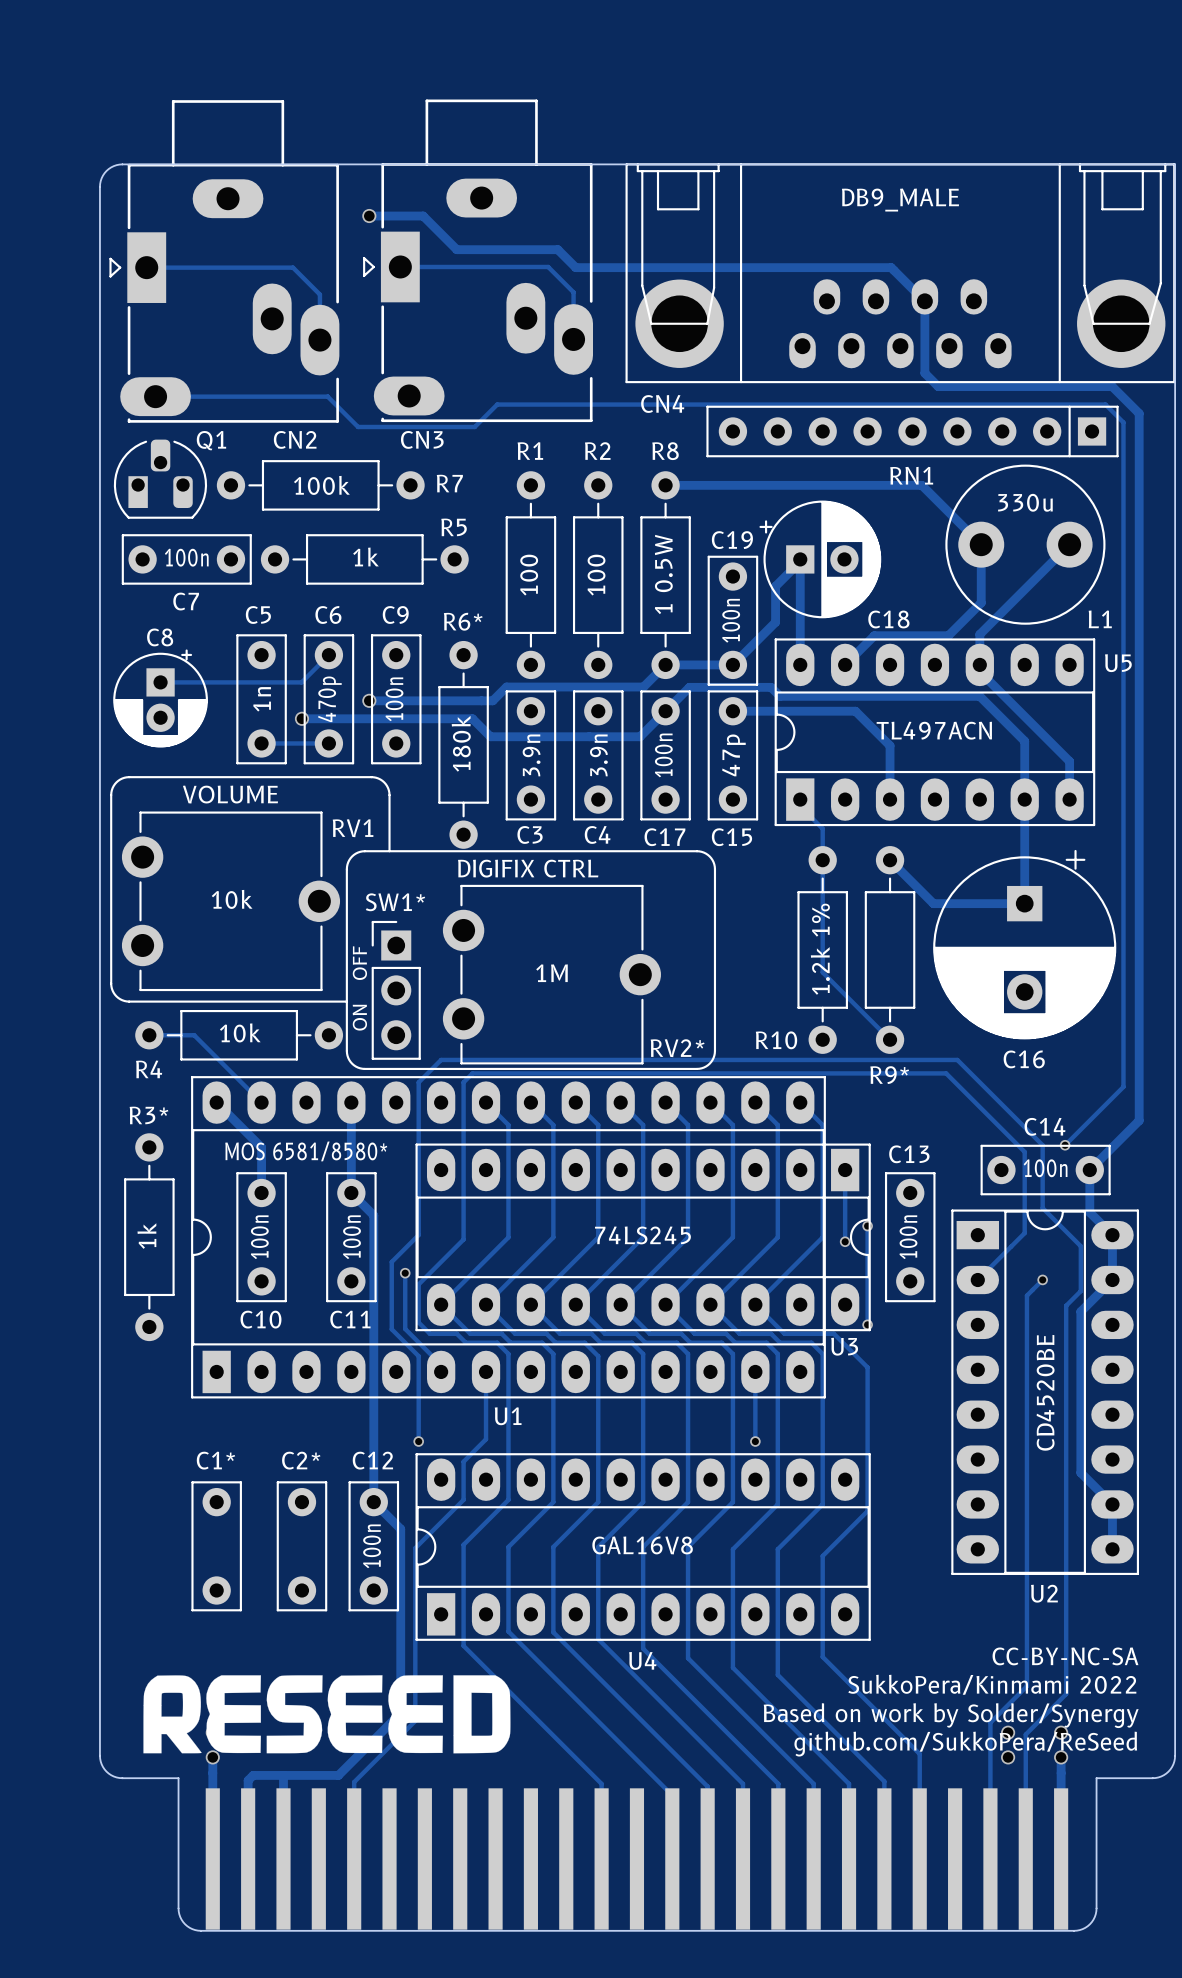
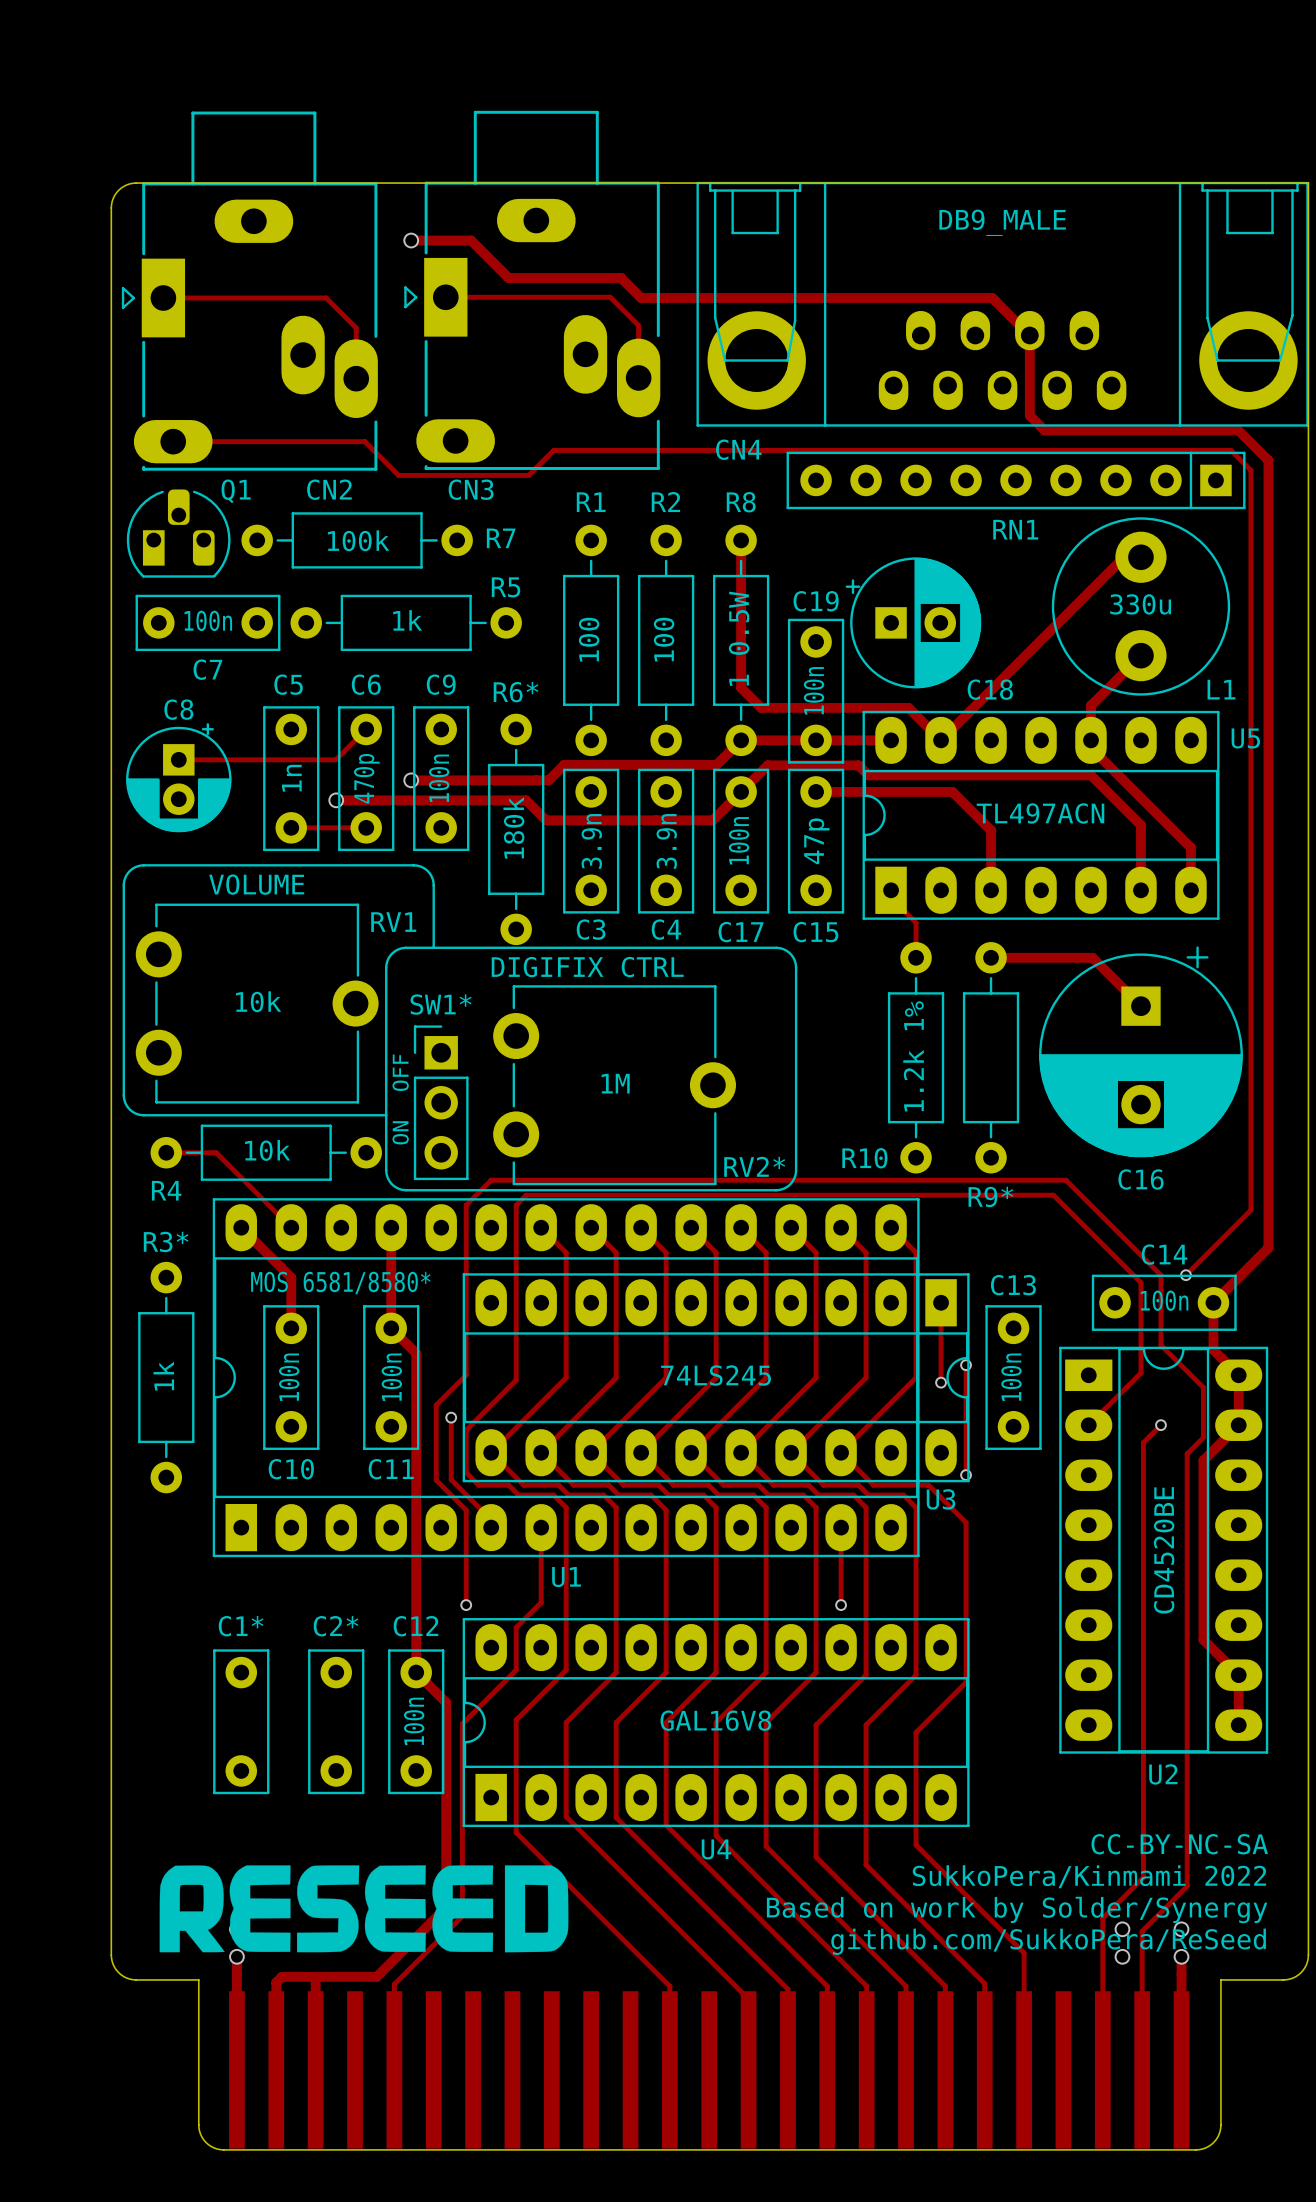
track: (665, 485) (921, 485) (981, 544) (981, 602) (948, 635) (874, 635) -> (741, 540) (741, 687) (761, 707) (908, 707) (941, 740)
track: none -> (1140, 557) (1124, 557) (973, 707)
L1 value position: 330u (1025, 502) -> 330u (1140, 604)
L1 rotation: 0° (1025, 544) -> 90° clockwise (1140, 606)
track: (1069, 544) (979, 634) -> (1140, 655) (1090, 706)
track: (800, 559) (800, 664) -> none
track: (800, 561) (775, 586) (775, 622) (732, 664) -> (891, 740) (816, 740)
track: (1024, 810) (1024, 903) (933, 903) (890, 860) -> (1140, 1006) (1092, 957) (991, 957)
track: (822, 860) (822, 972) (890, 1039) -> none

